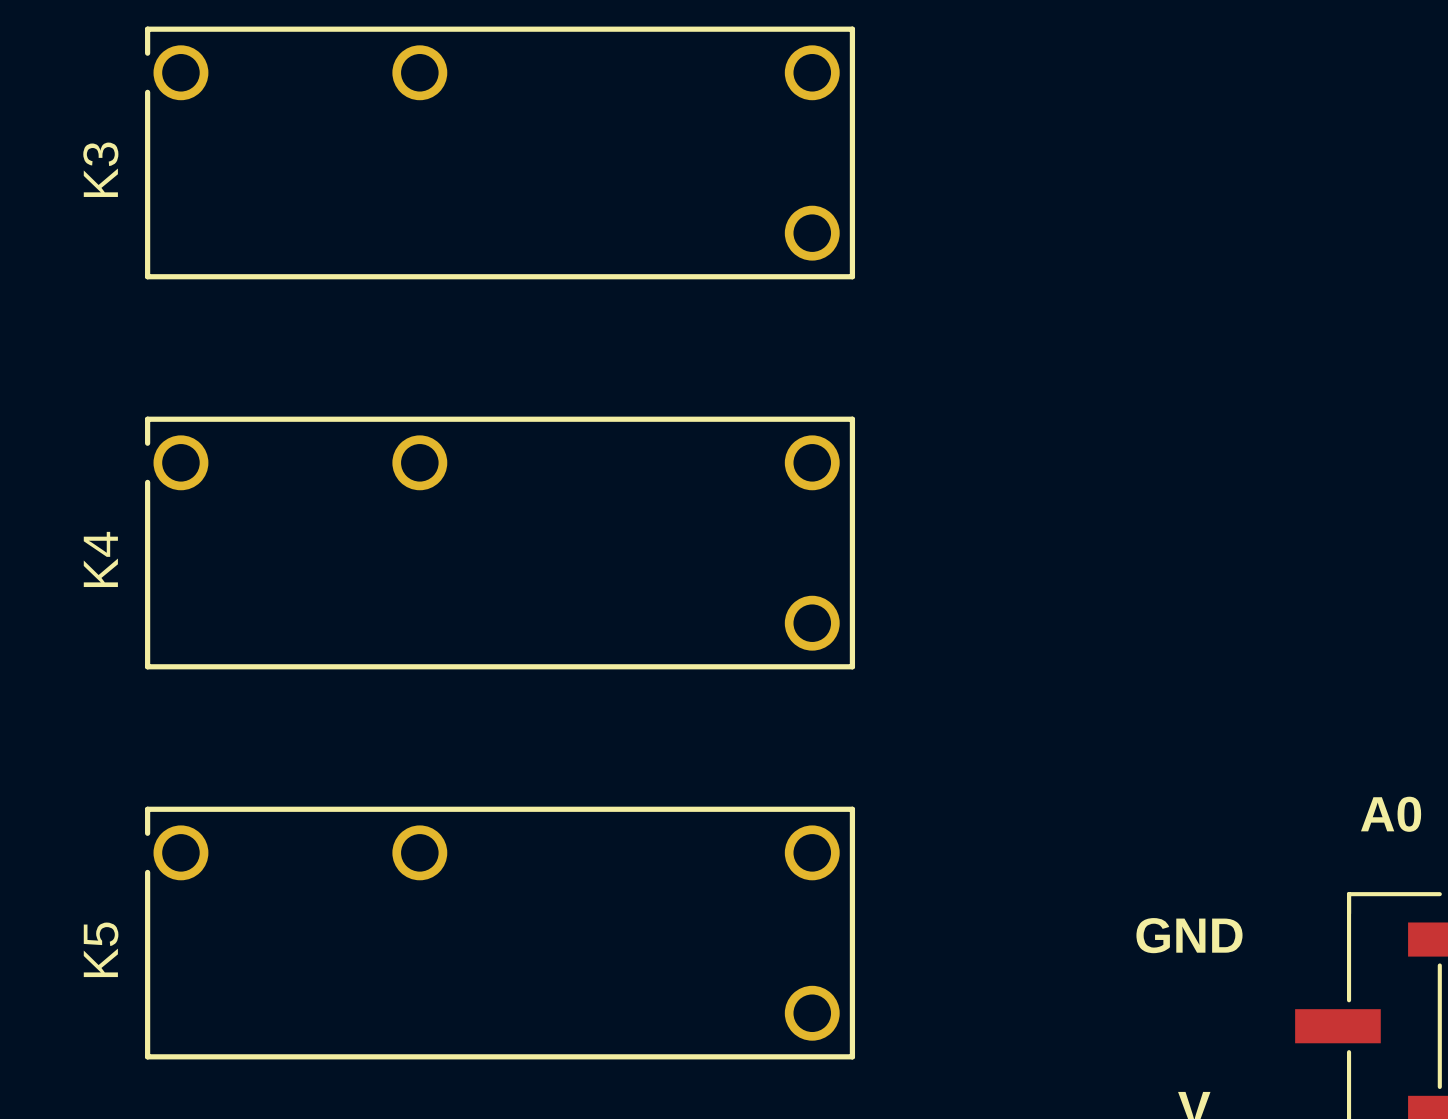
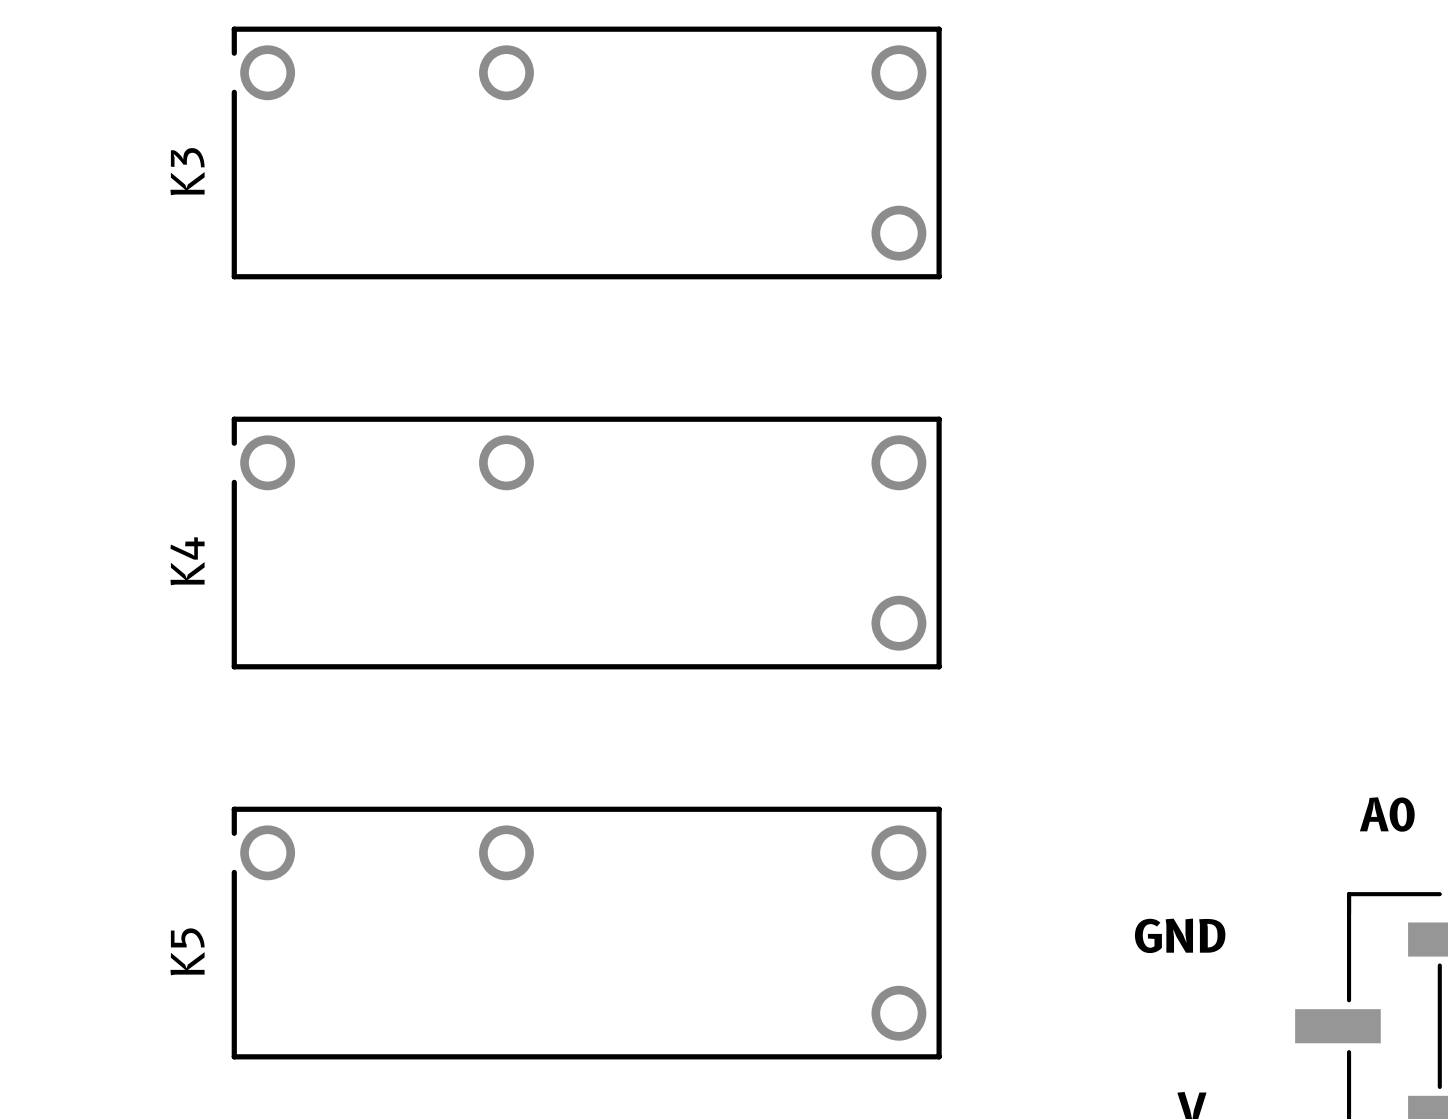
K3 position: (500, 152) -> (586, 152)
K4 position: (500, 543) -> (586, 543)
K5 position: (500, 933) -> (586, 933)

